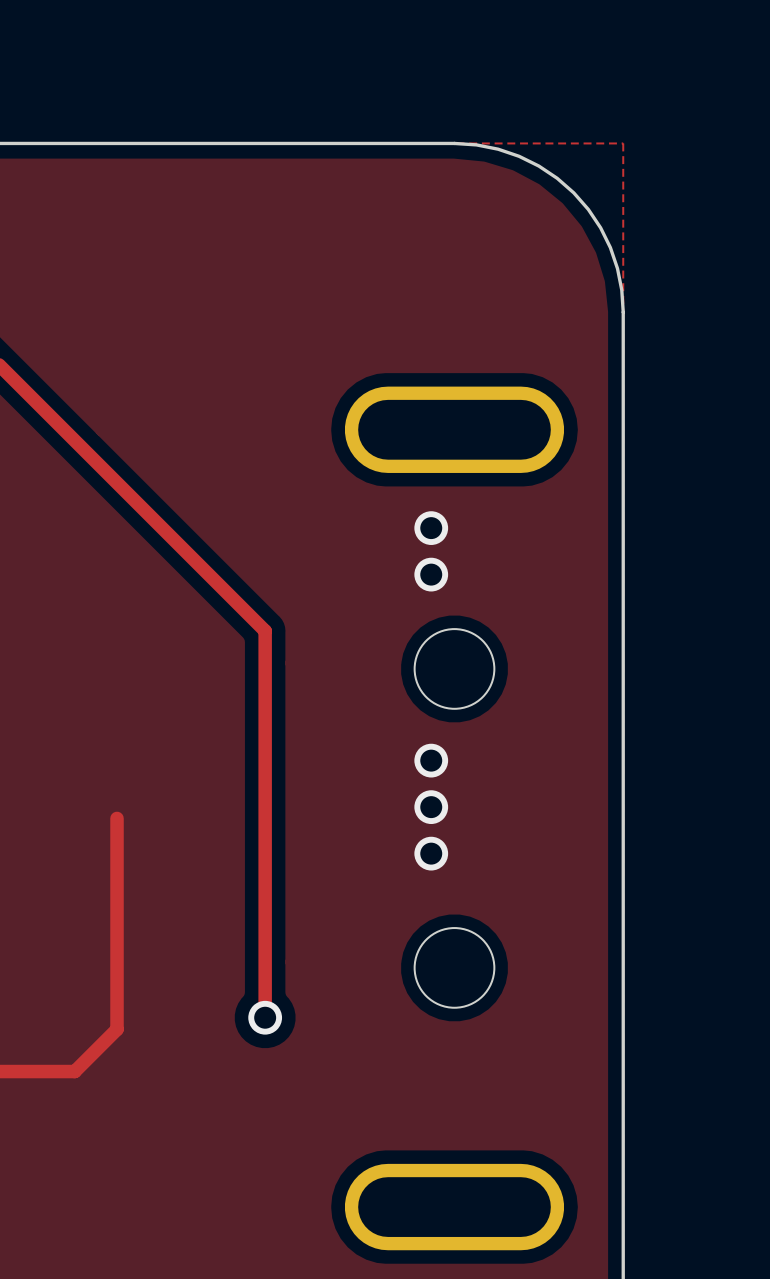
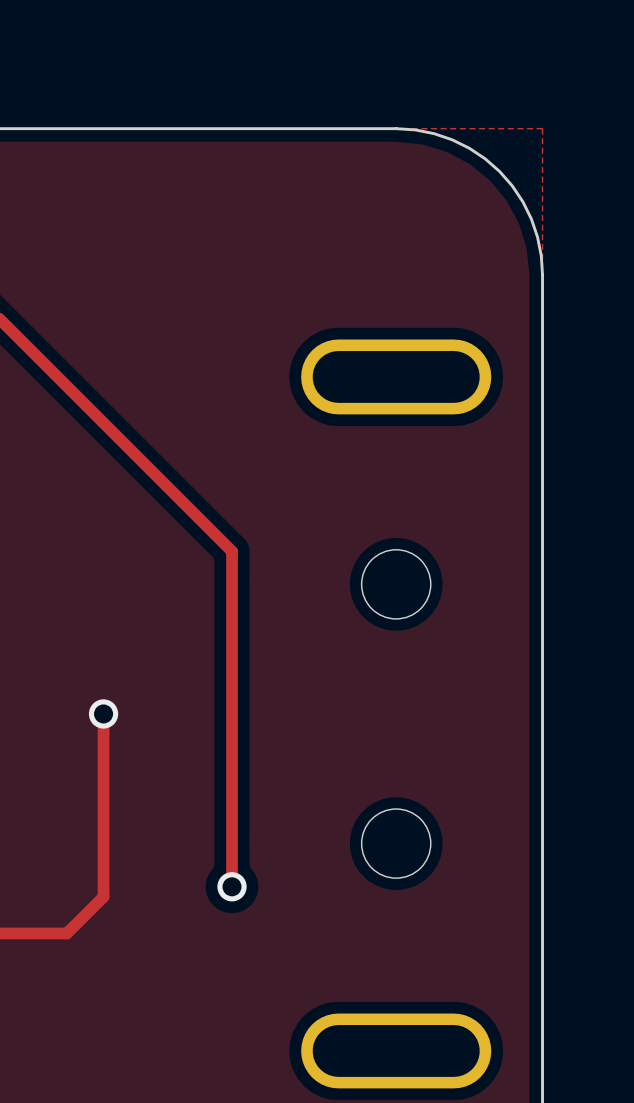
via: (431, 528) -> none
via: (431, 574) -> none
via: (431, 760) -> none
via: (431, 807) -> none
via: none -> (103, 713)
via: (431, 853) -> none

